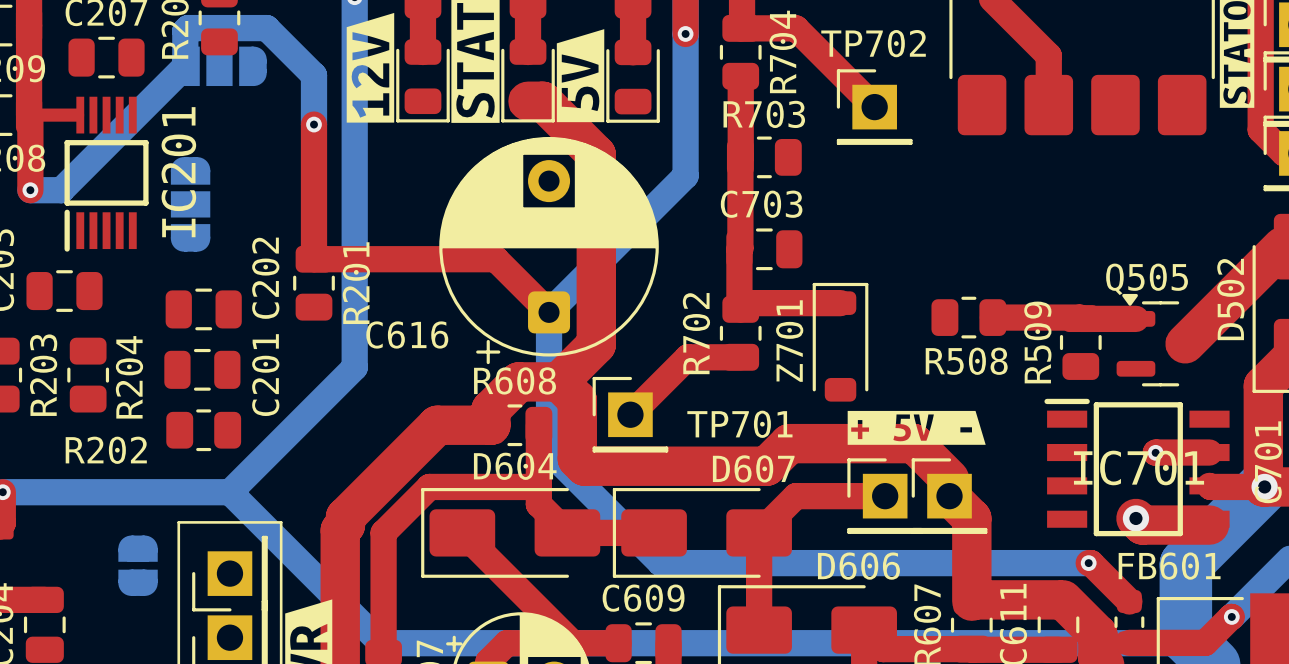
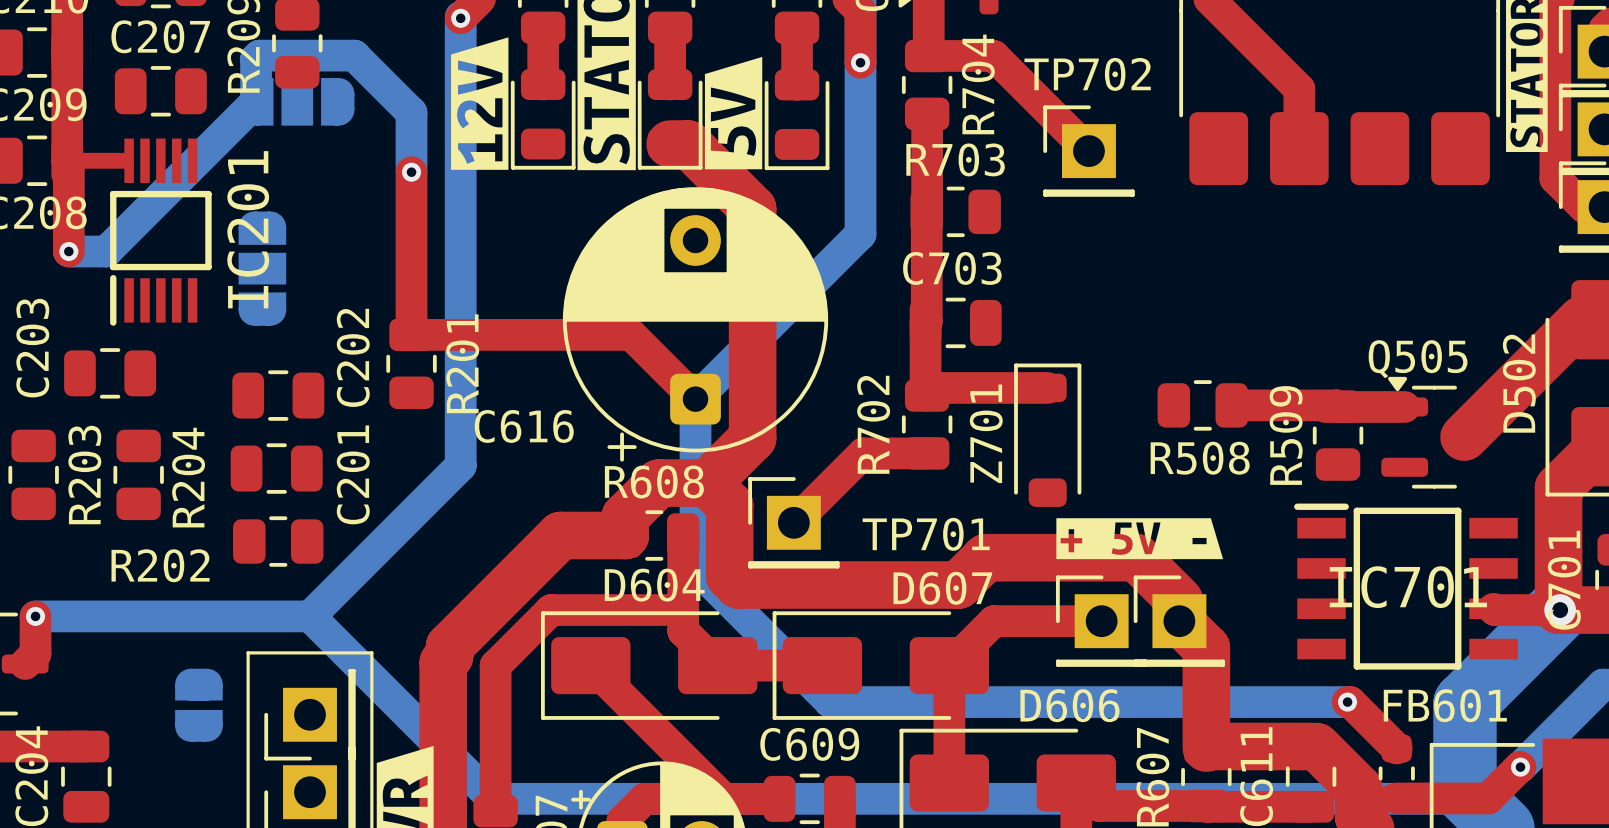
top track: (1155, 452) (1209, 452) -> none
via: (1155, 452) -> none
top track: (1135, 518) (1142, 525) (1209, 525) -> none
via: (1135, 518) -> none

